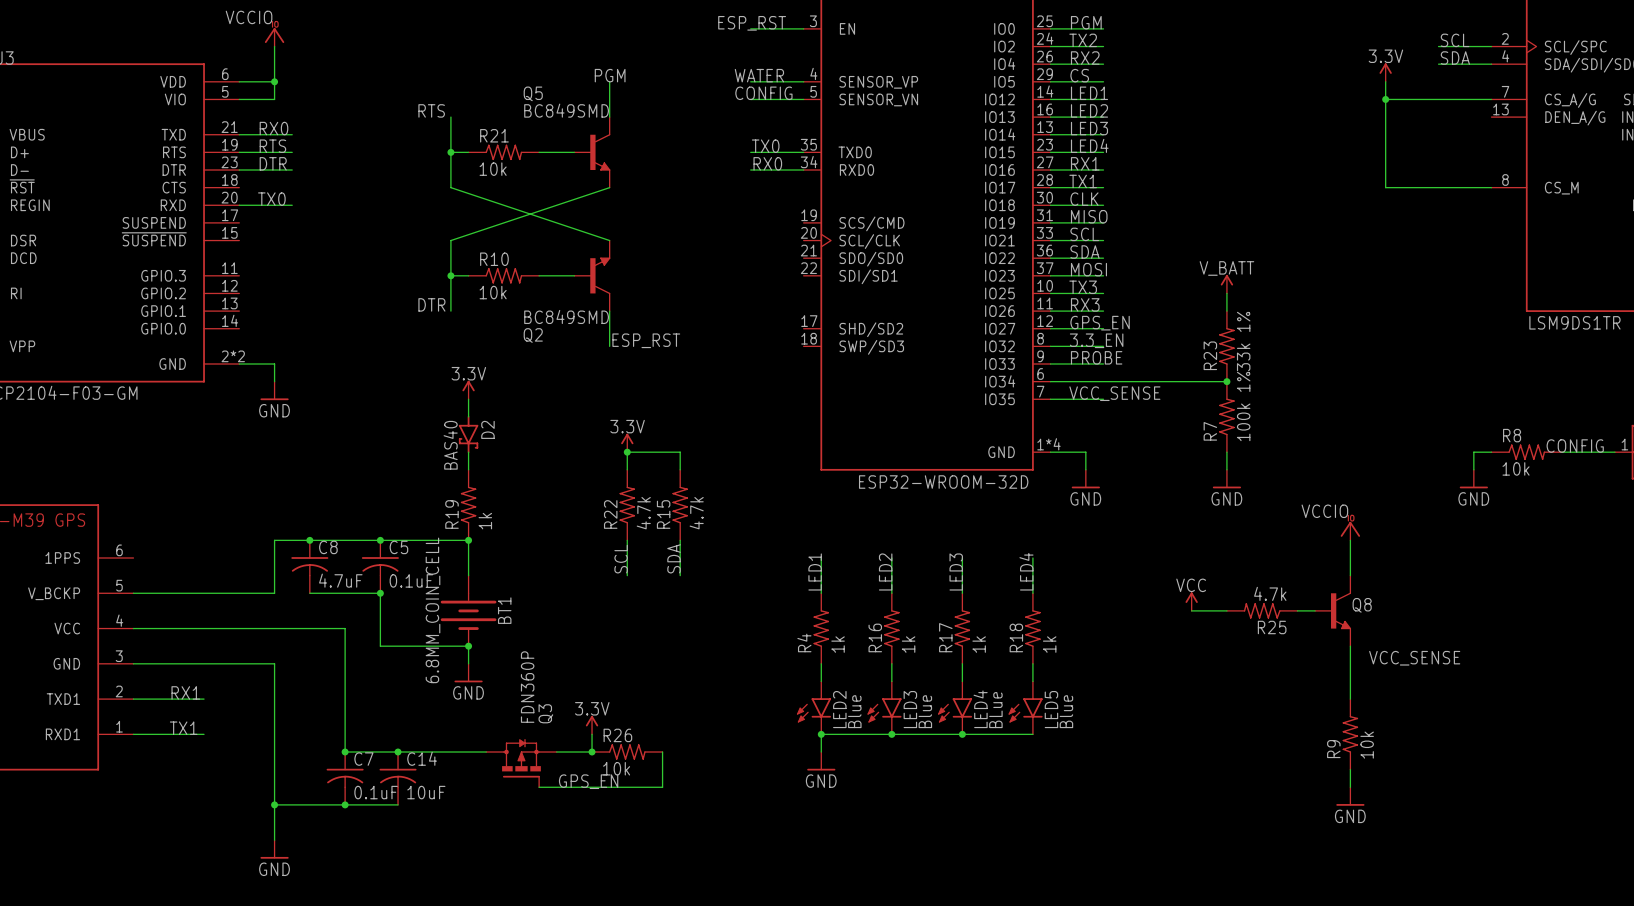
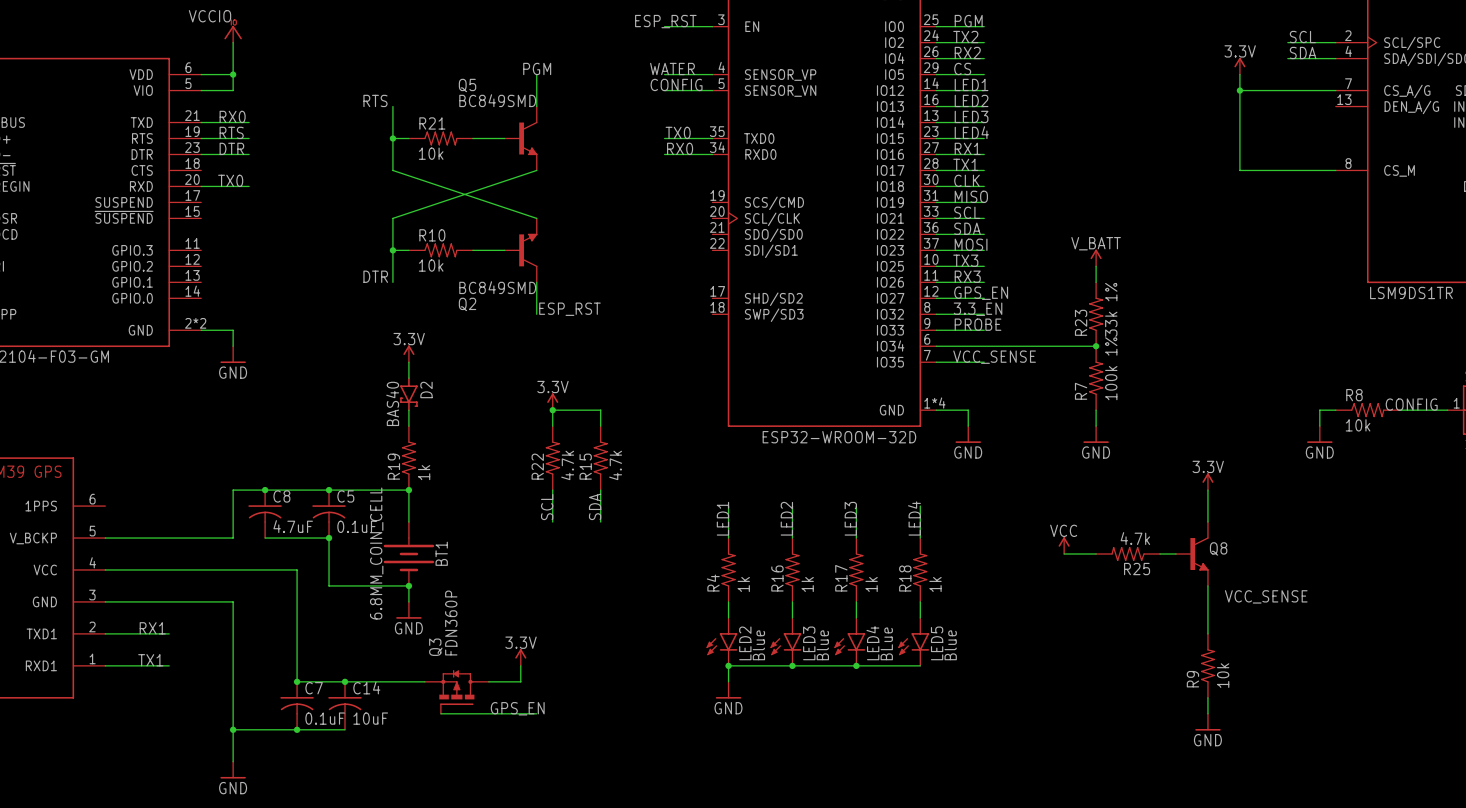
power symbol: VCCIO (1350, 531) -> 3.3V (1207, 481)
junction: (592, 752) -> none
R26: 10k (627, 752) -> none
wire: (662, 752) (662, 787) (609, 787) -> none
Q3 flip: as is (521, 763) -> left-right (456, 692)
wire: none -> (440, 713) (472, 713)

